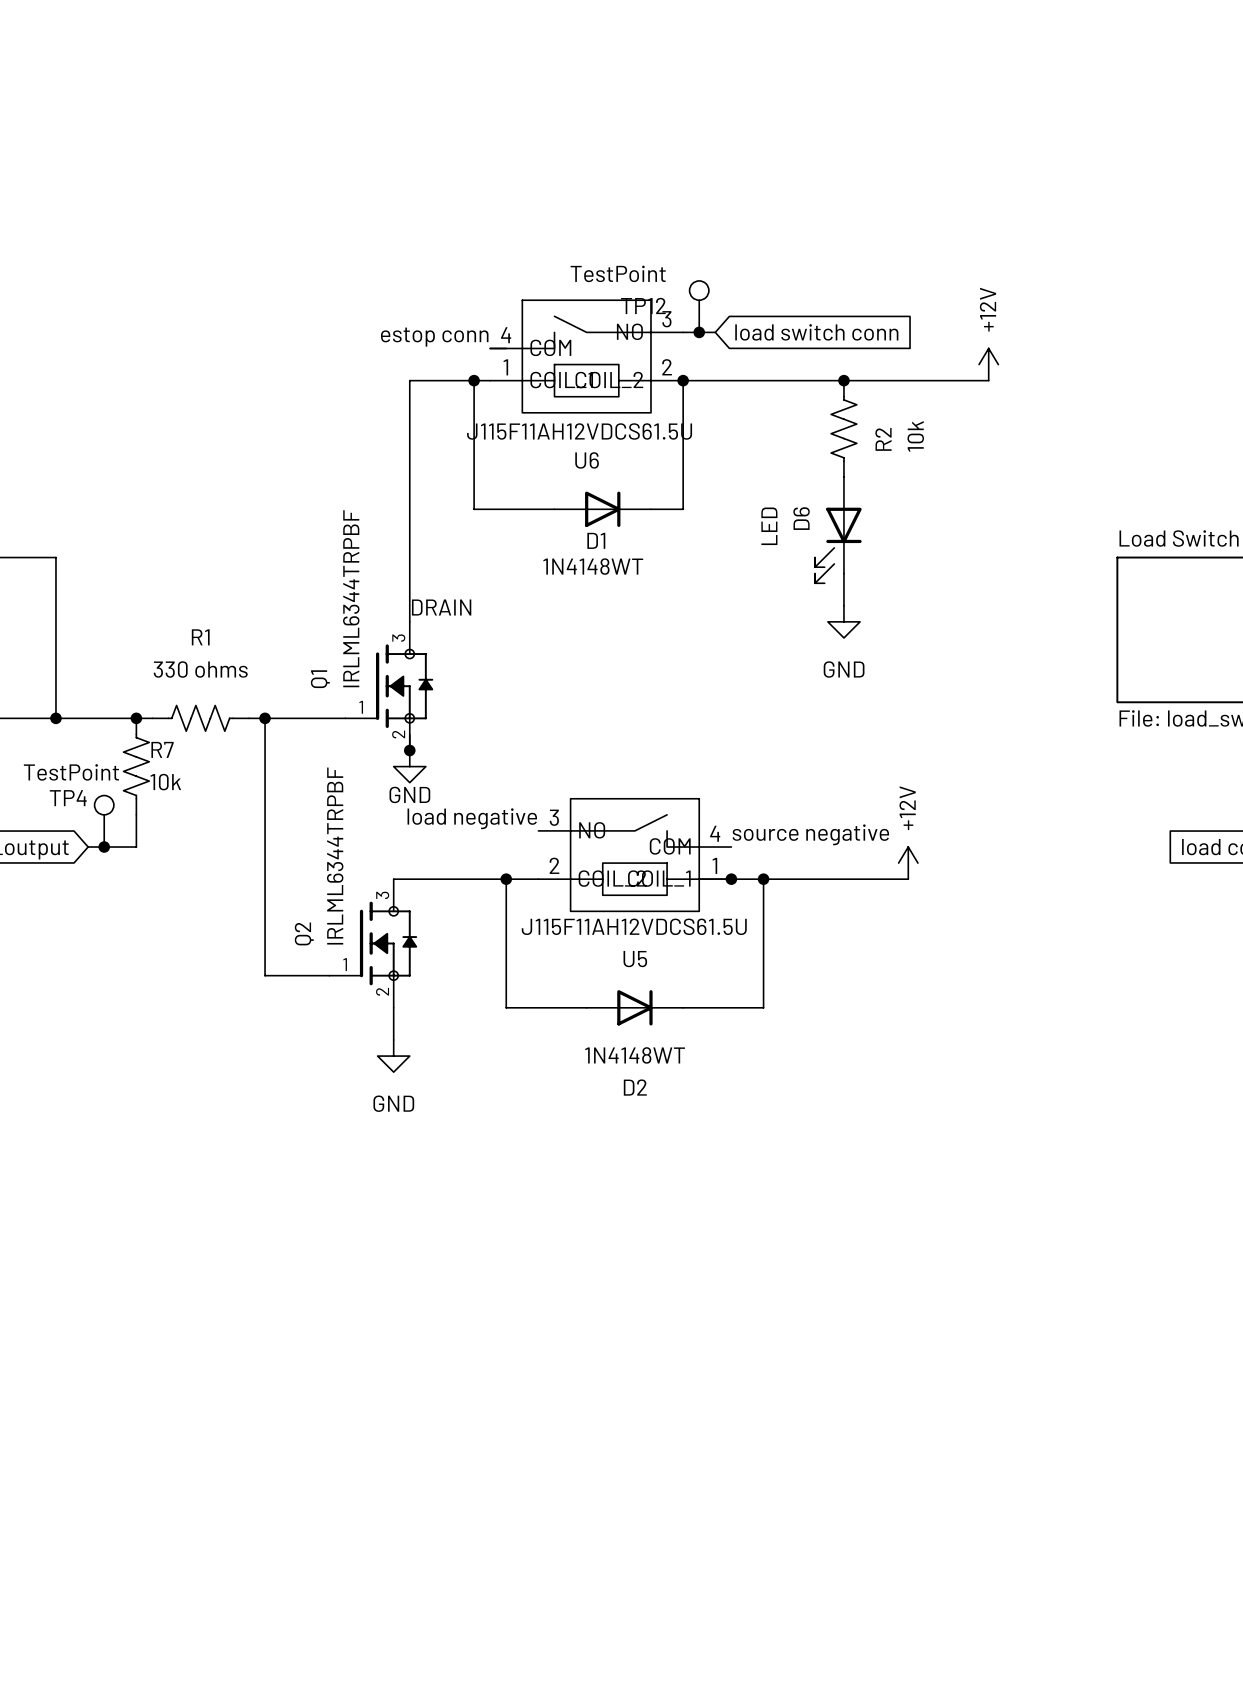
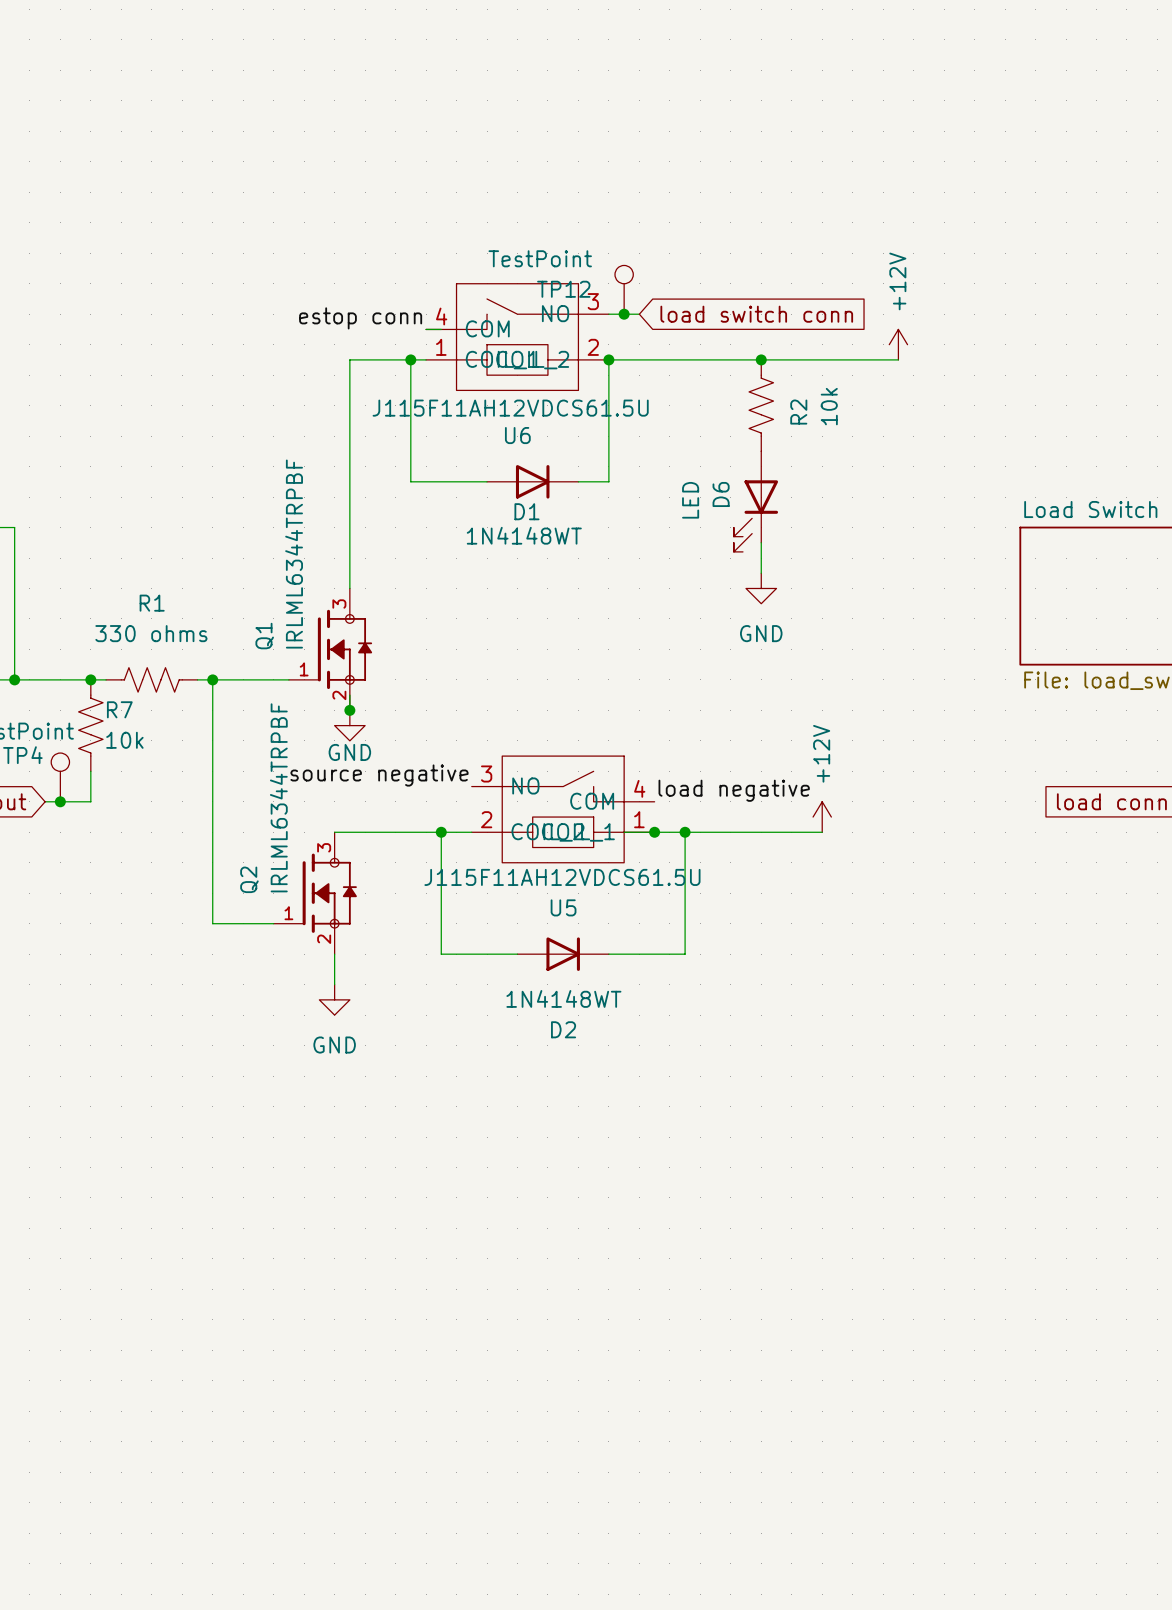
label: DRAIN (441, 607) -> none
label: load negative (472, 818) -> source negative (379, 775)
label: source negative (810, 834) -> load negative (734, 790)

